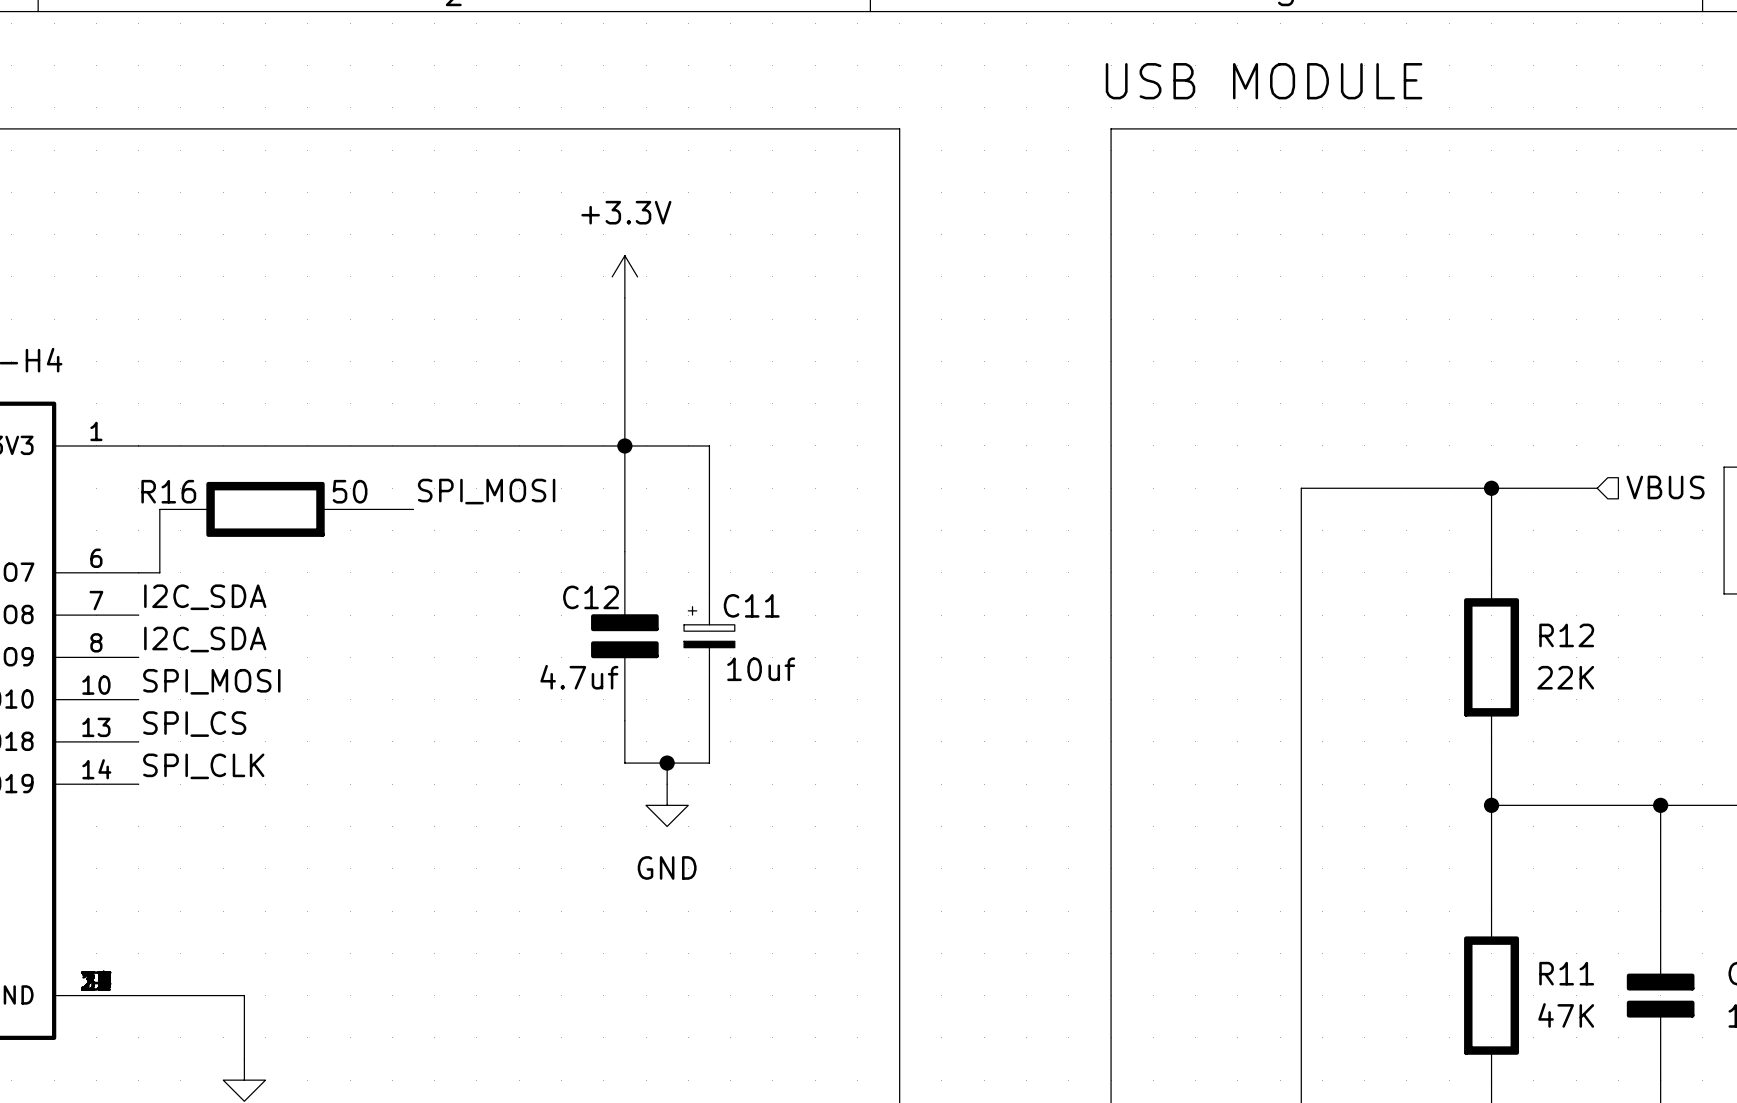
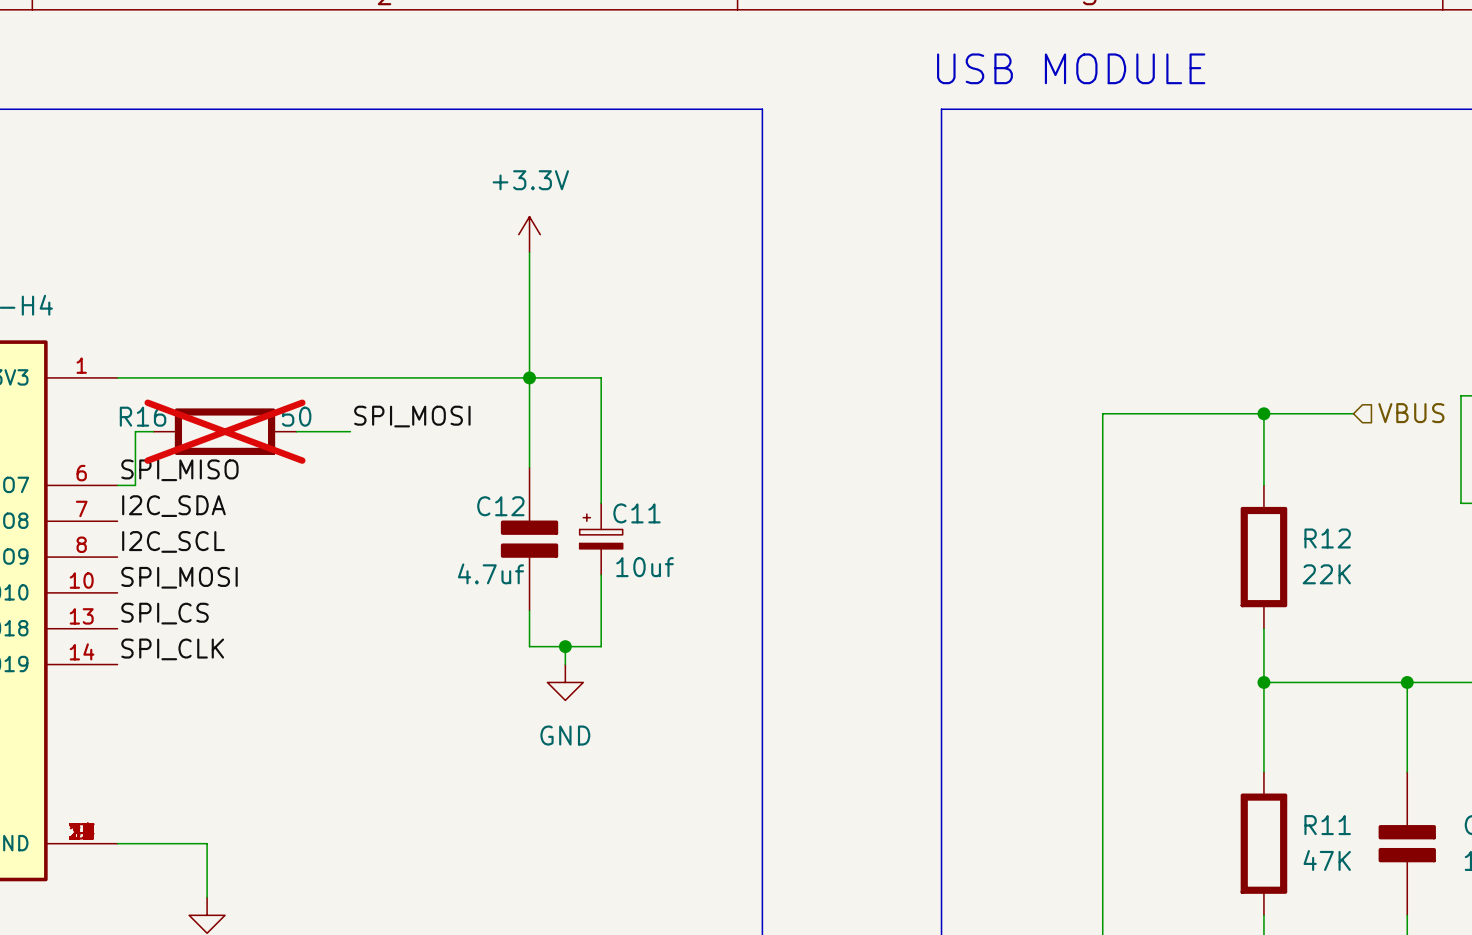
R16 do-not-place cross: none -> (225, 431)
label: none -> SPI_MISO (179, 470)
label: I2C_SDA (205, 639) -> I2C_SCL (173, 541)

